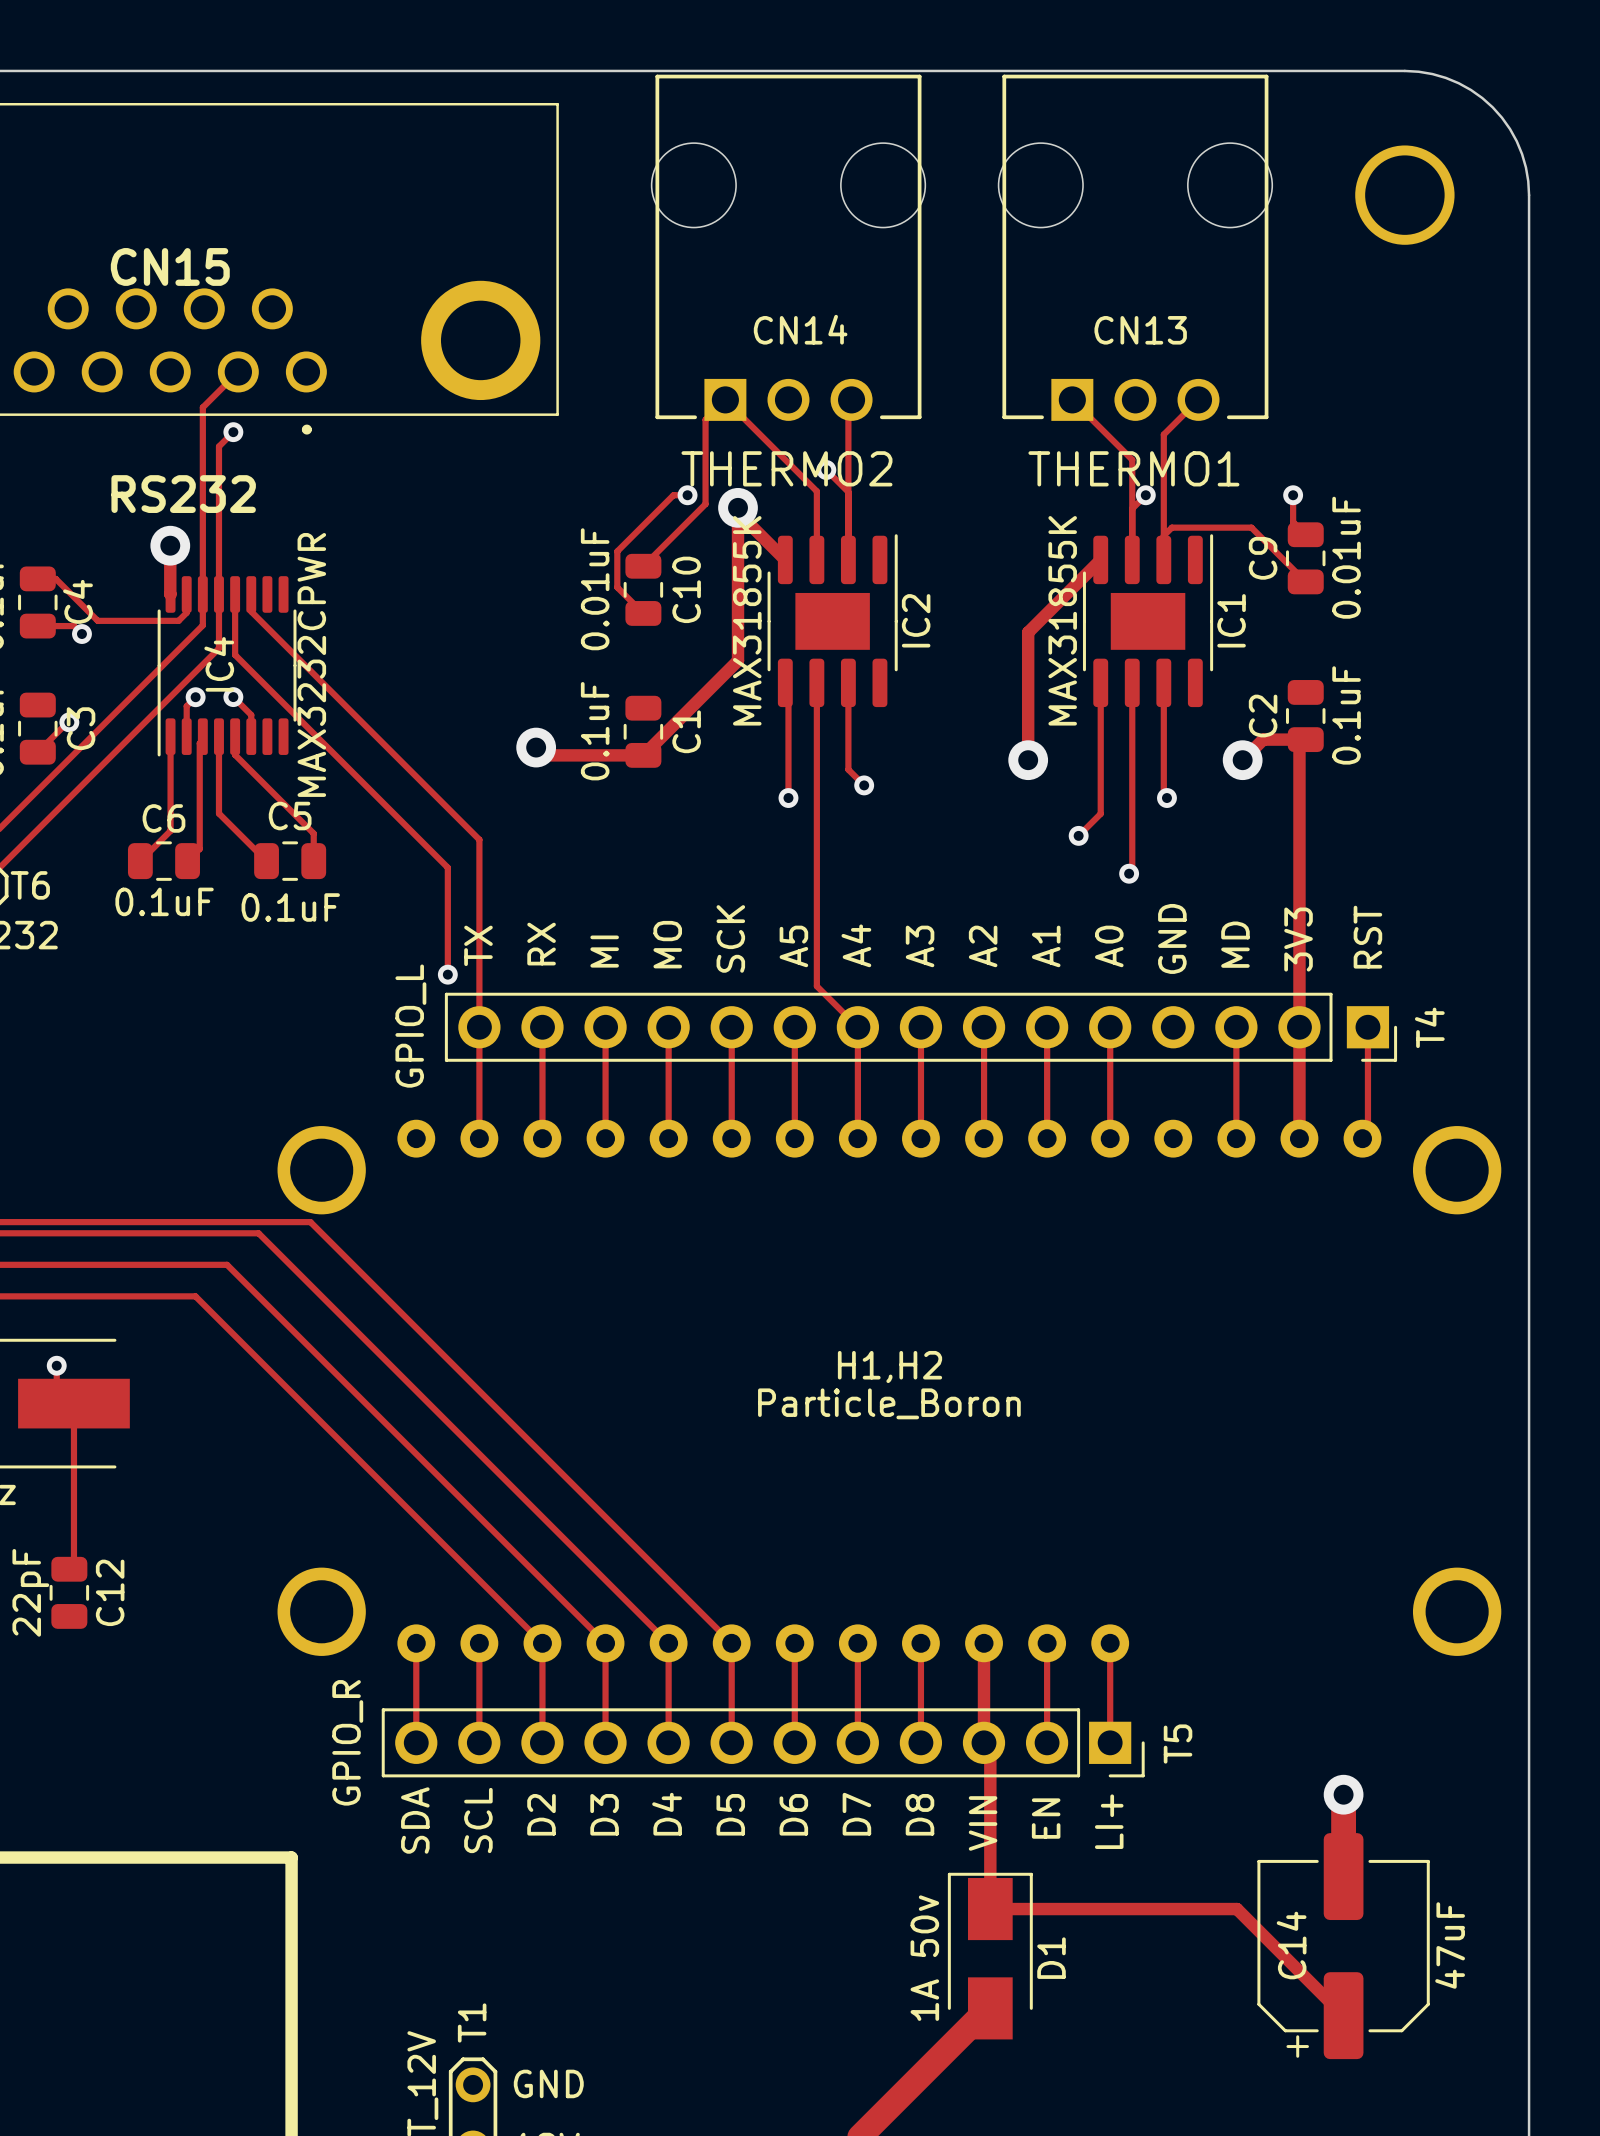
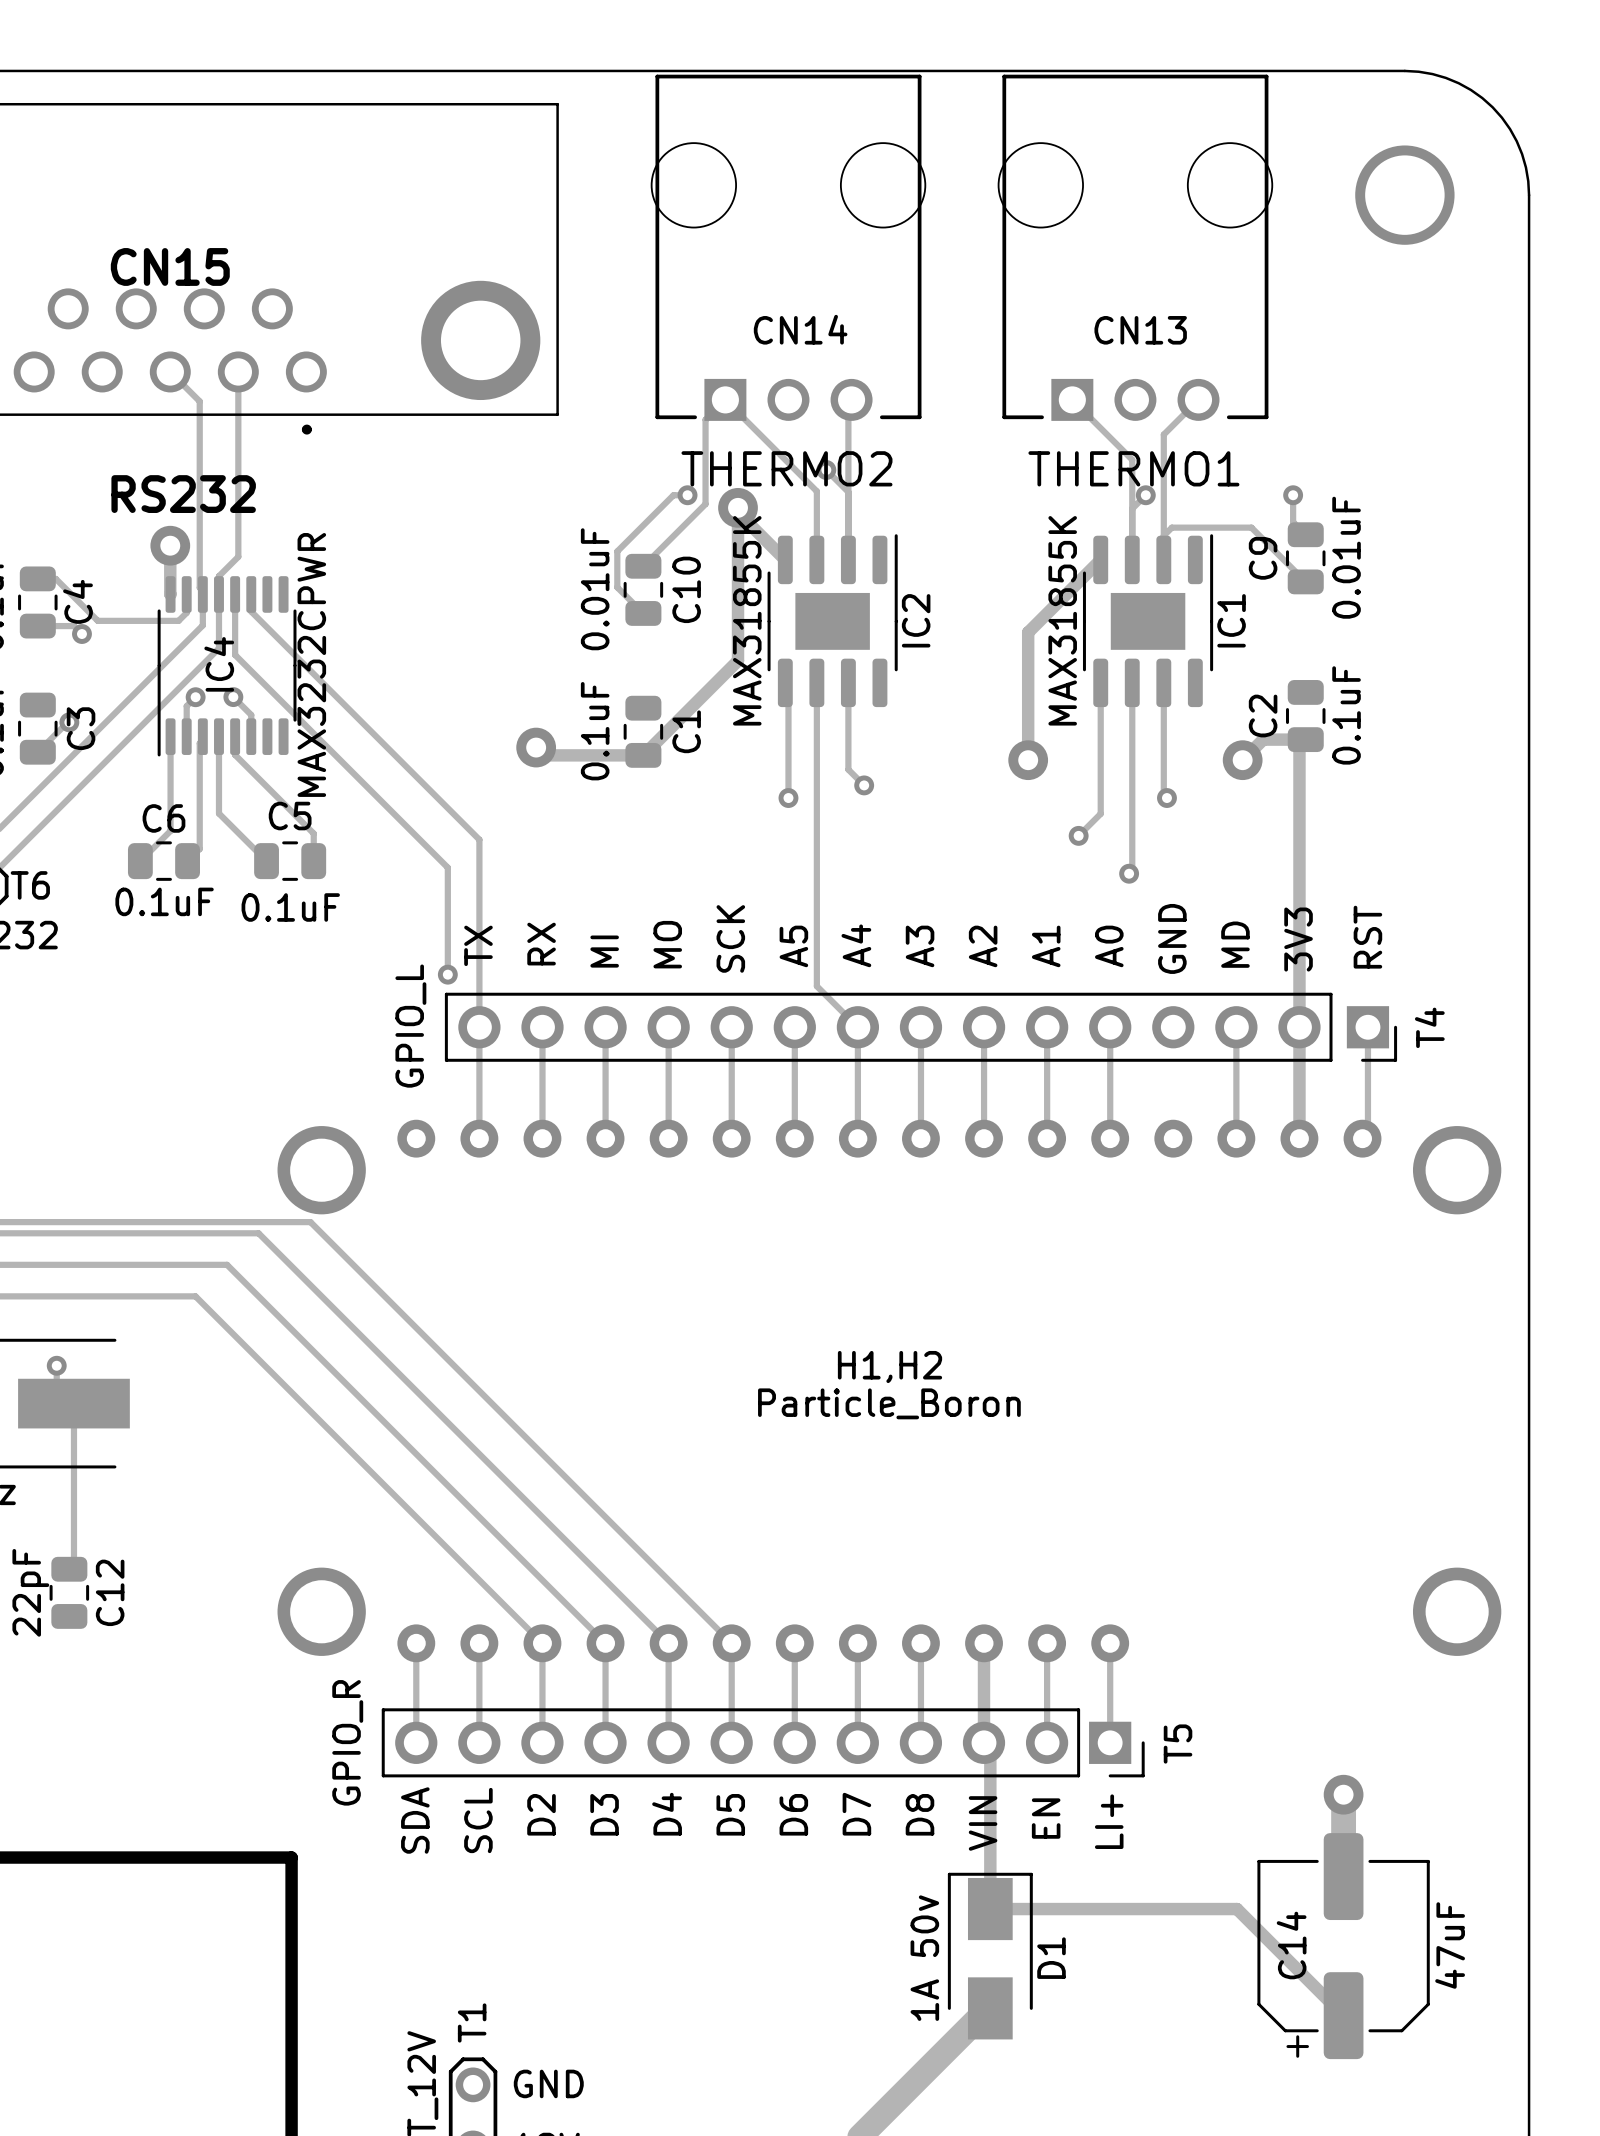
track: none -> (170, 371) (199, 401) (199, 587) (202, 590)
track: (238, 371) (202, 407) (202, 590) -> (238, 371) (238, 556) (218, 576)
track: (233, 432) (218, 446) (218, 576) -> none
via: (233, 432) -> none

